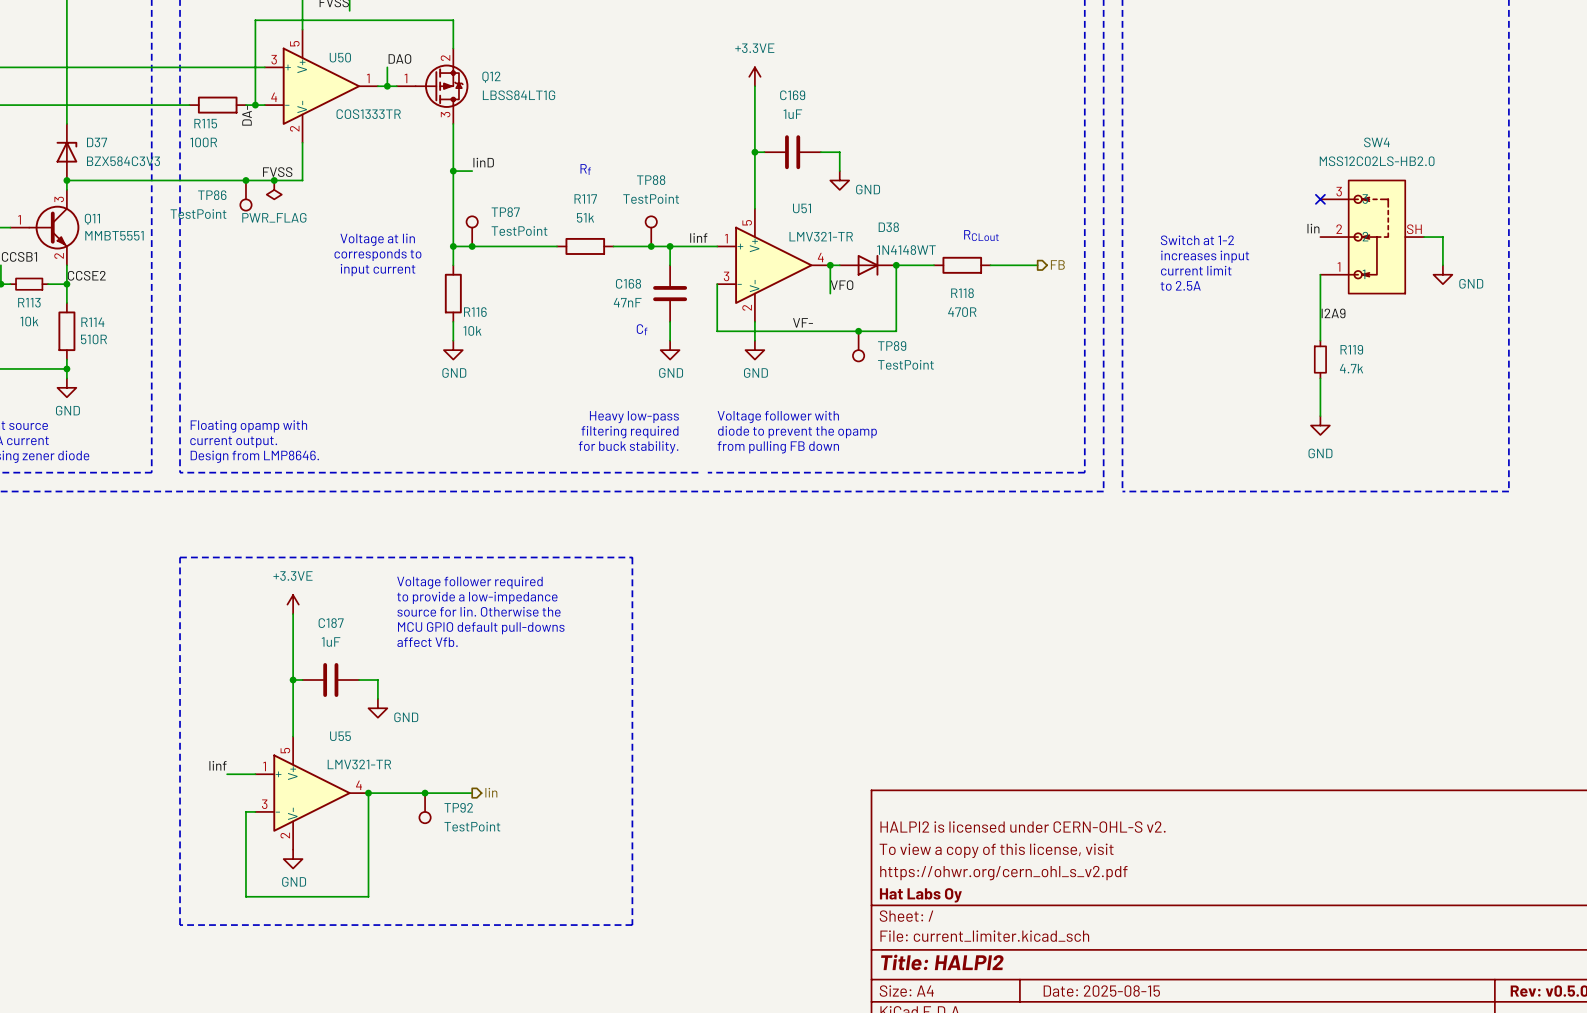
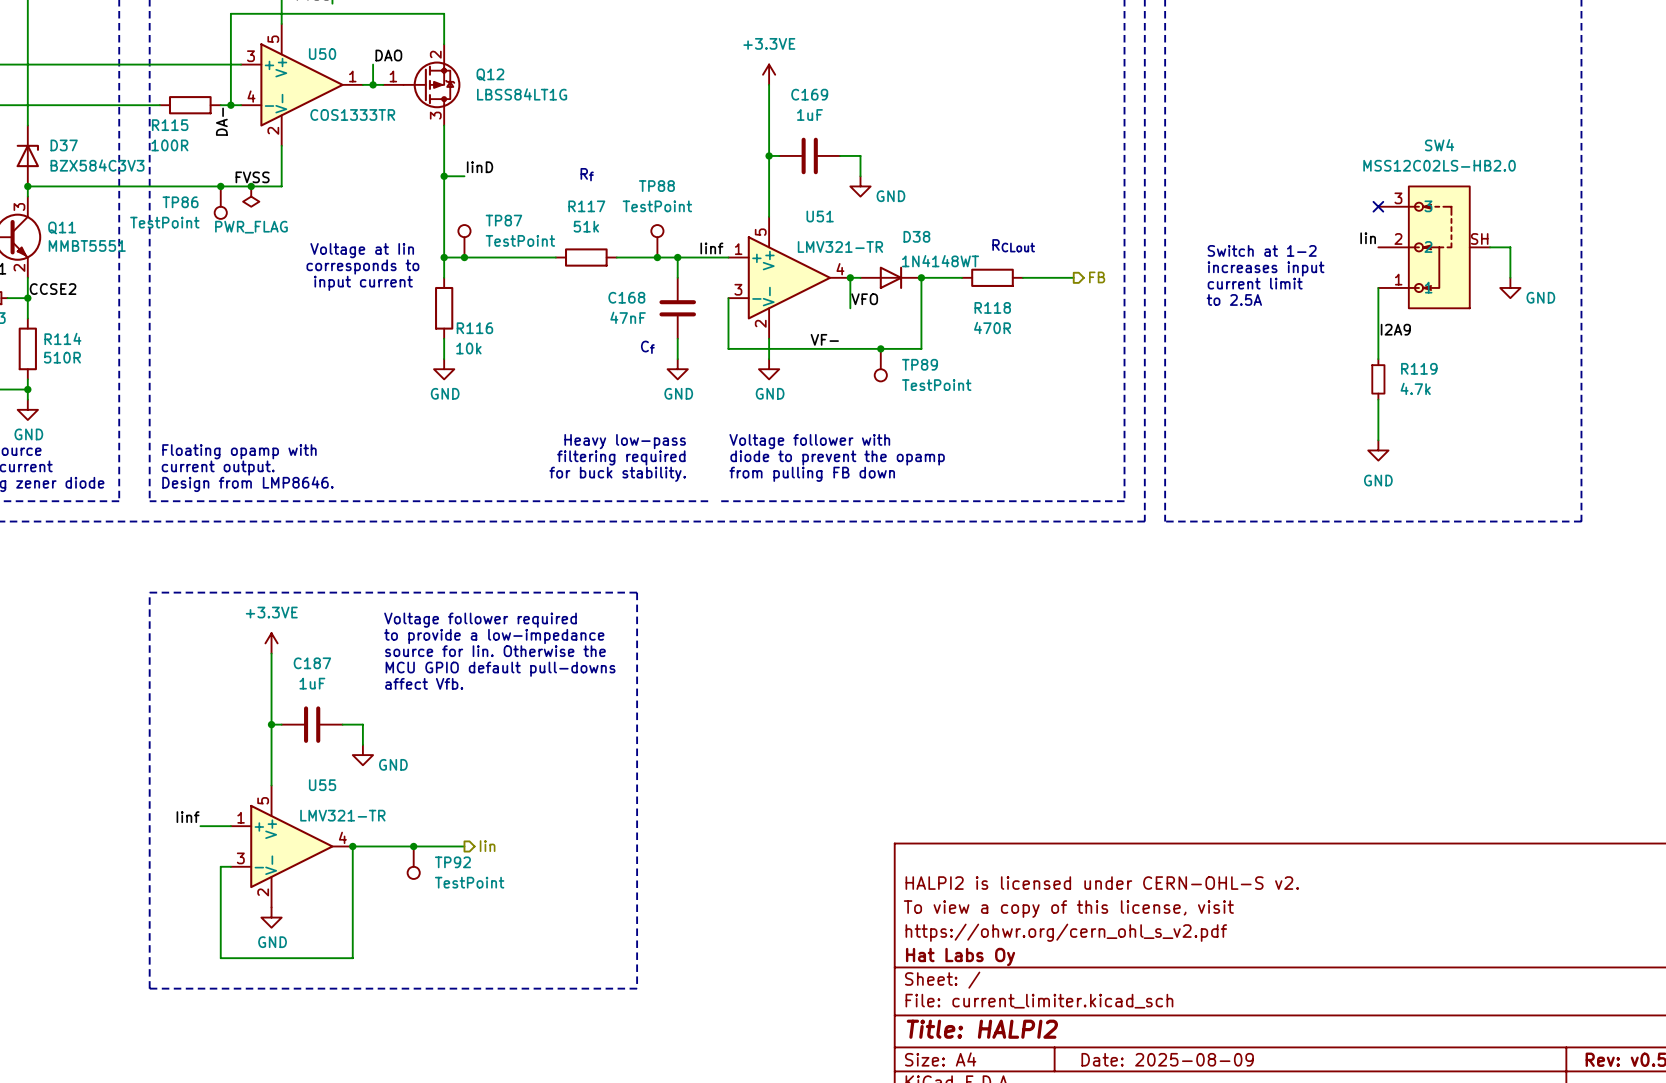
title block: Date: 2025-08-15 (1101, 991) -> Date: 2025-08-09 (1167, 1059)

